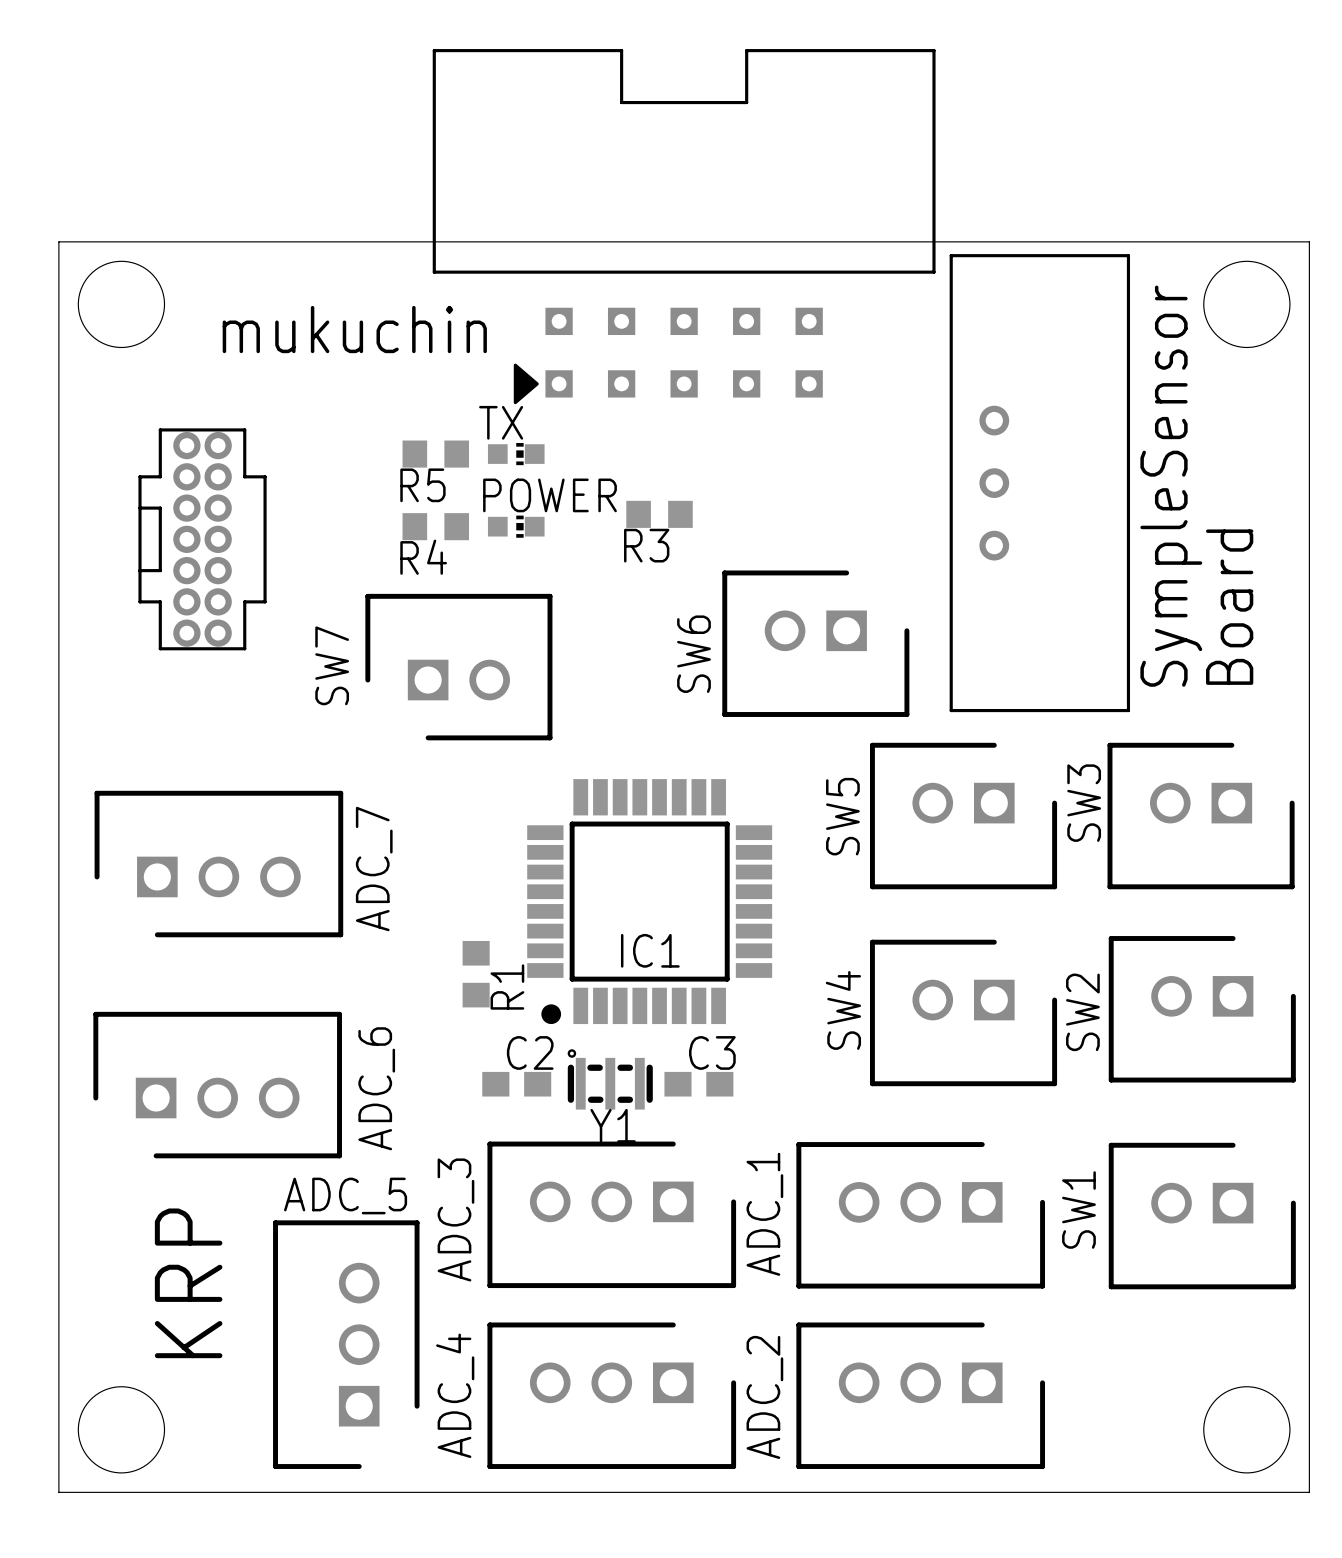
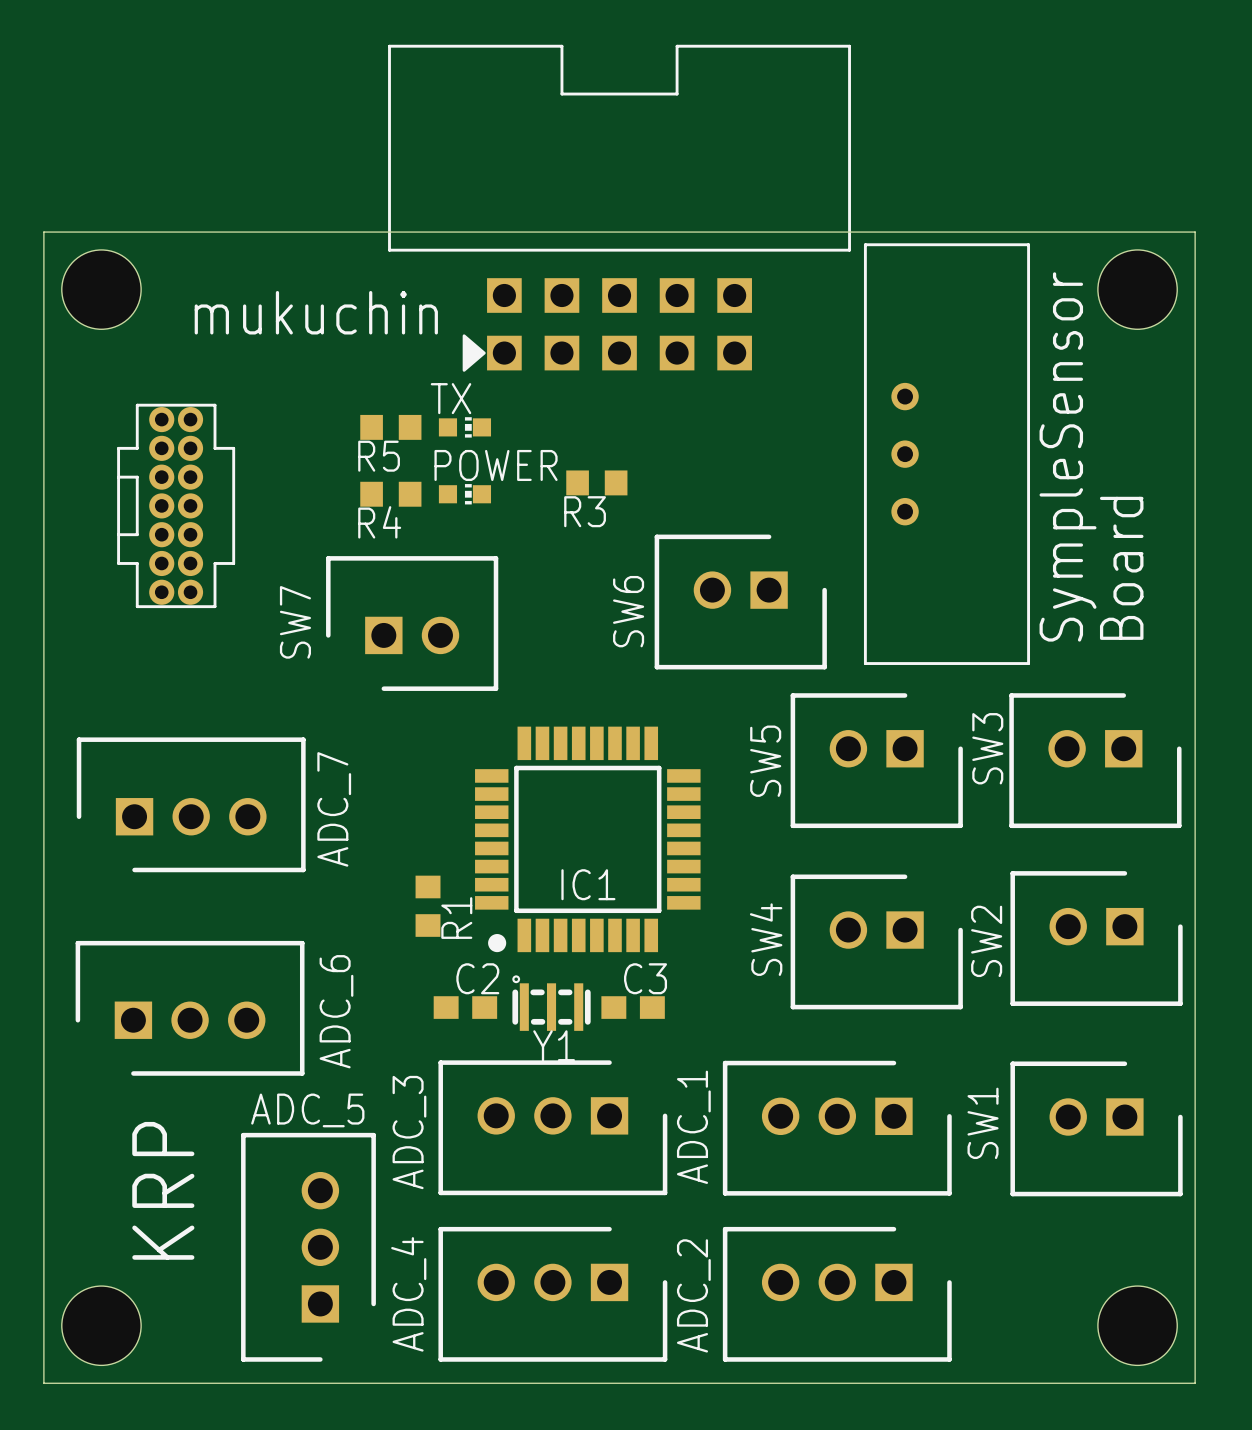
part footprint: [432, 49, 936, 405] -> [388, 44, 851, 372]

